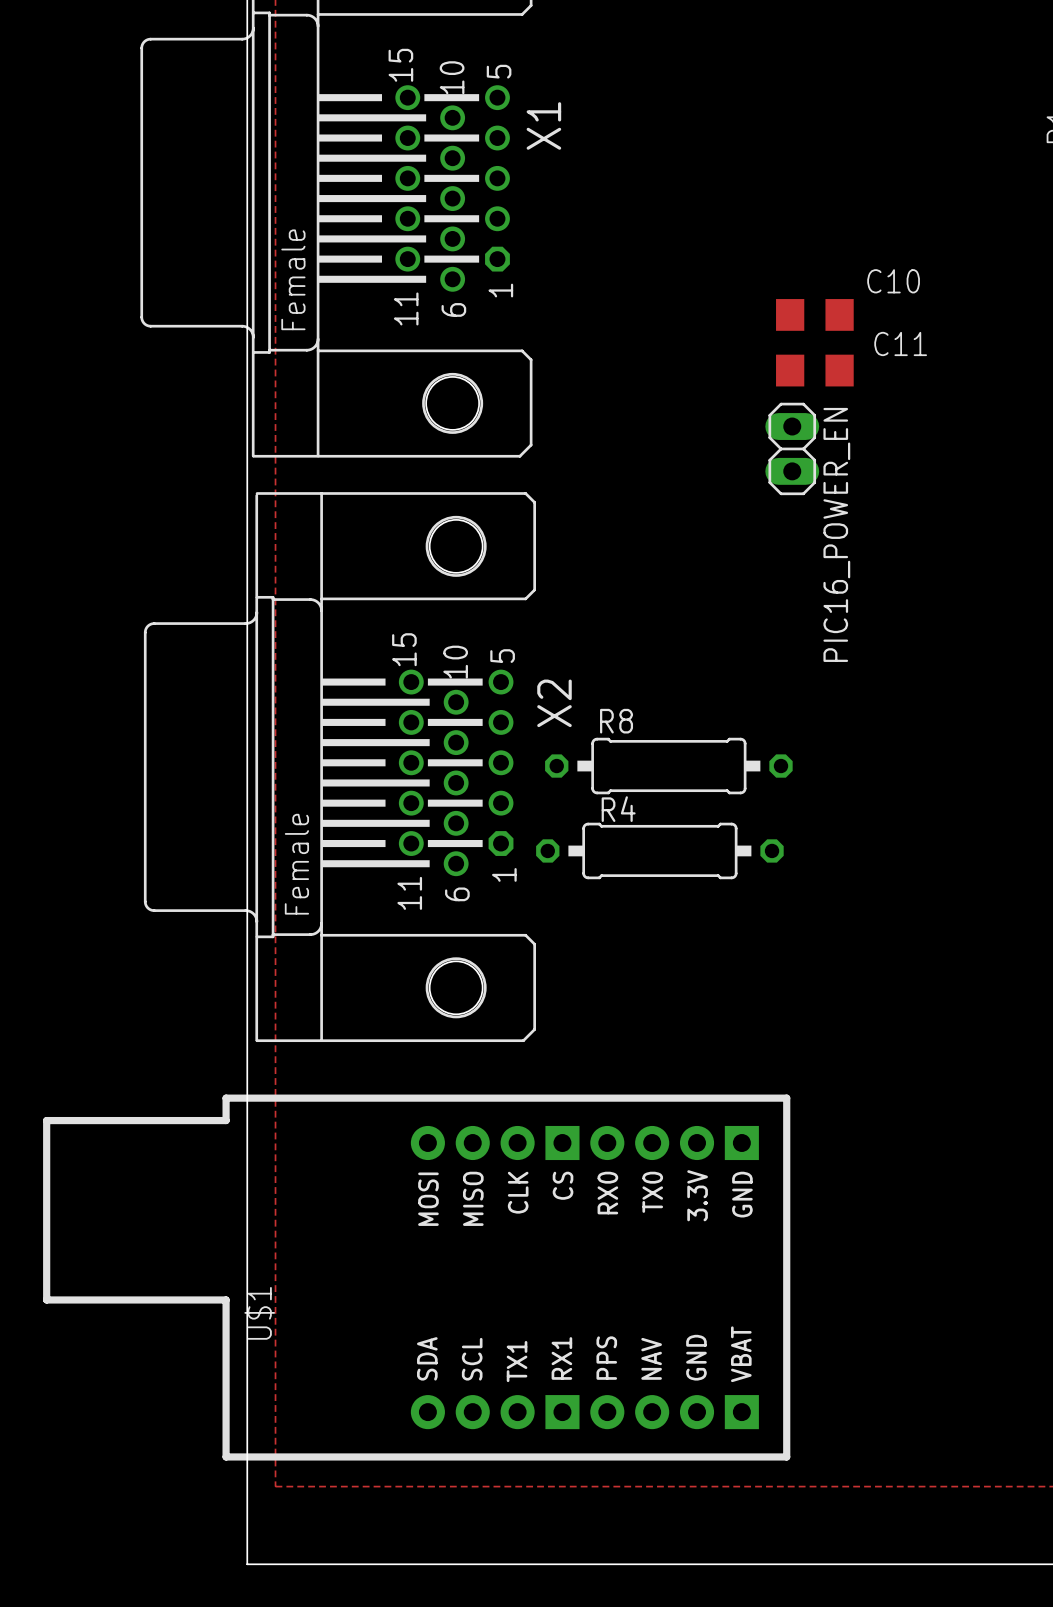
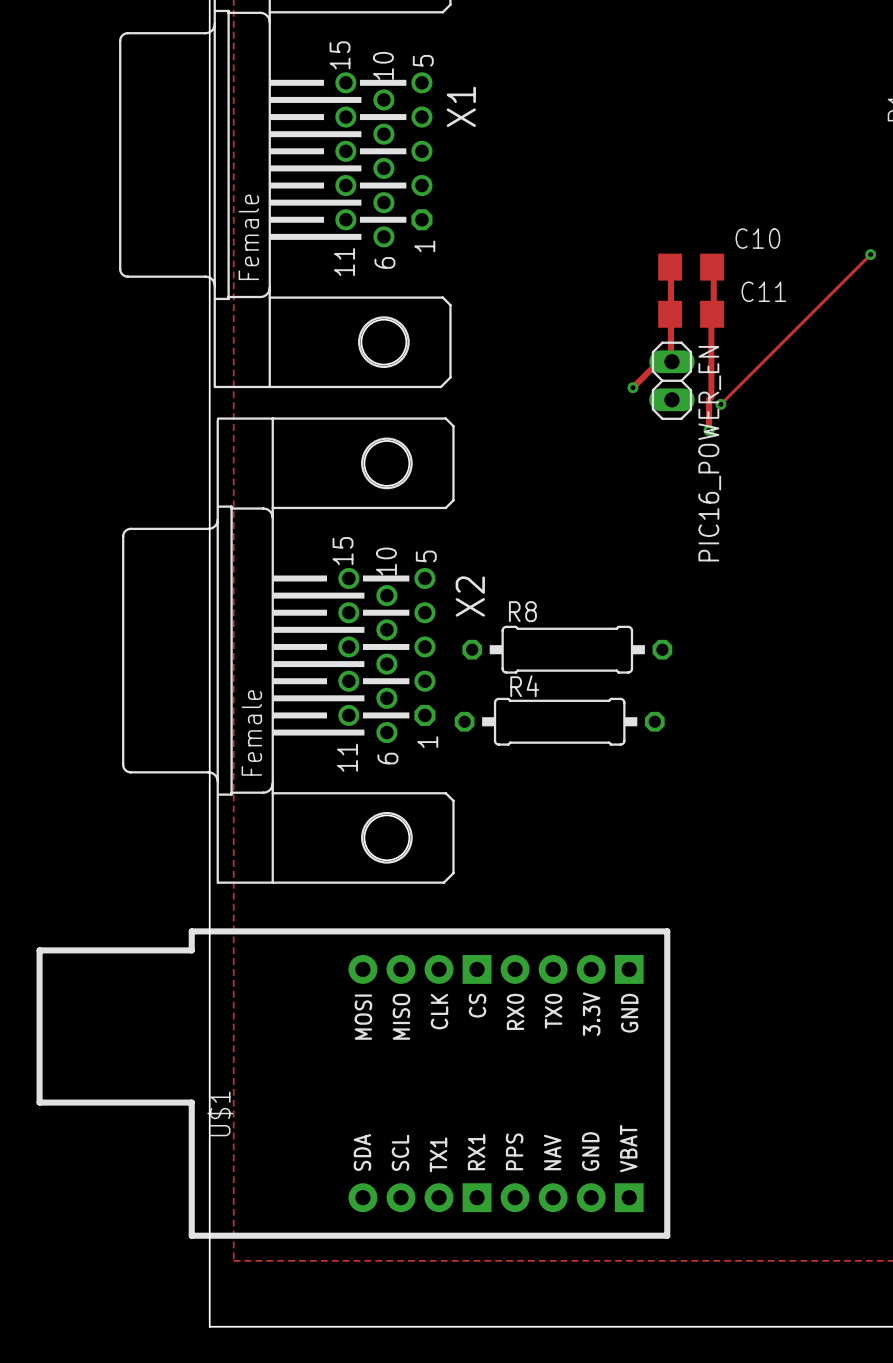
track: none -> (870, 254) (720, 404)
via: none -> (870, 254)
track: none -> (670, 267) (671, 361) (659, 361) (632, 387)
track: none -> (712, 267) (713, 268) (713, 314) (711, 316) (711, 397) (709, 399) (709, 430)
via: none -> (632, 387)
via: none -> (720, 404)
via: none -> (709, 430)

